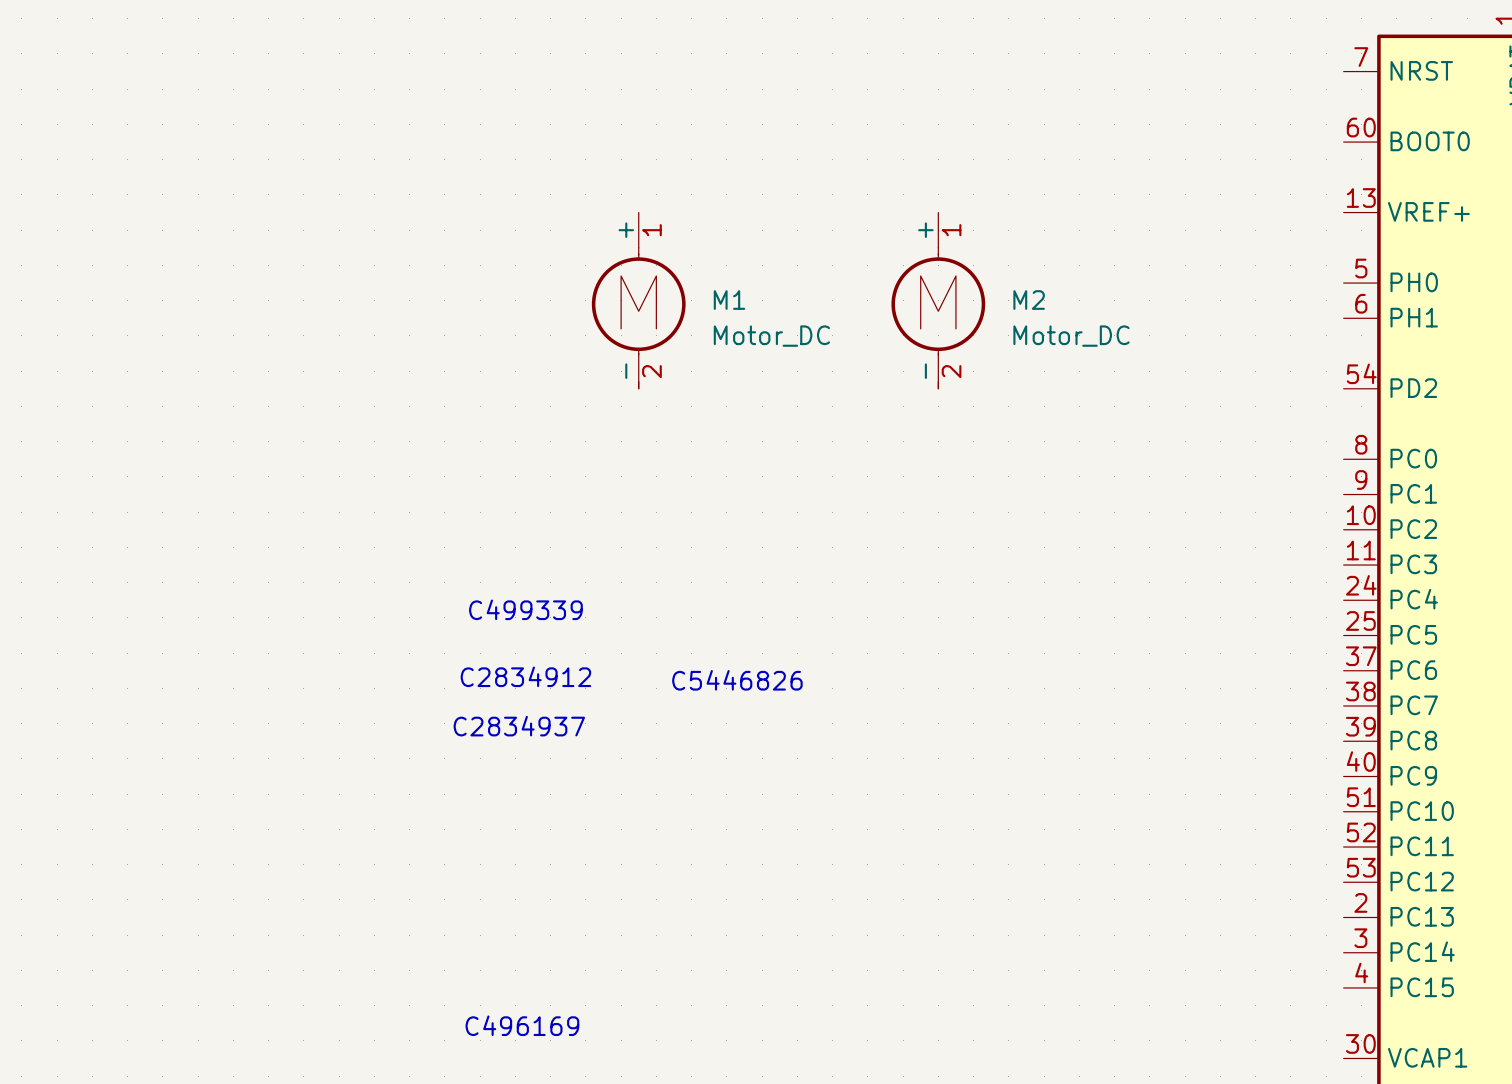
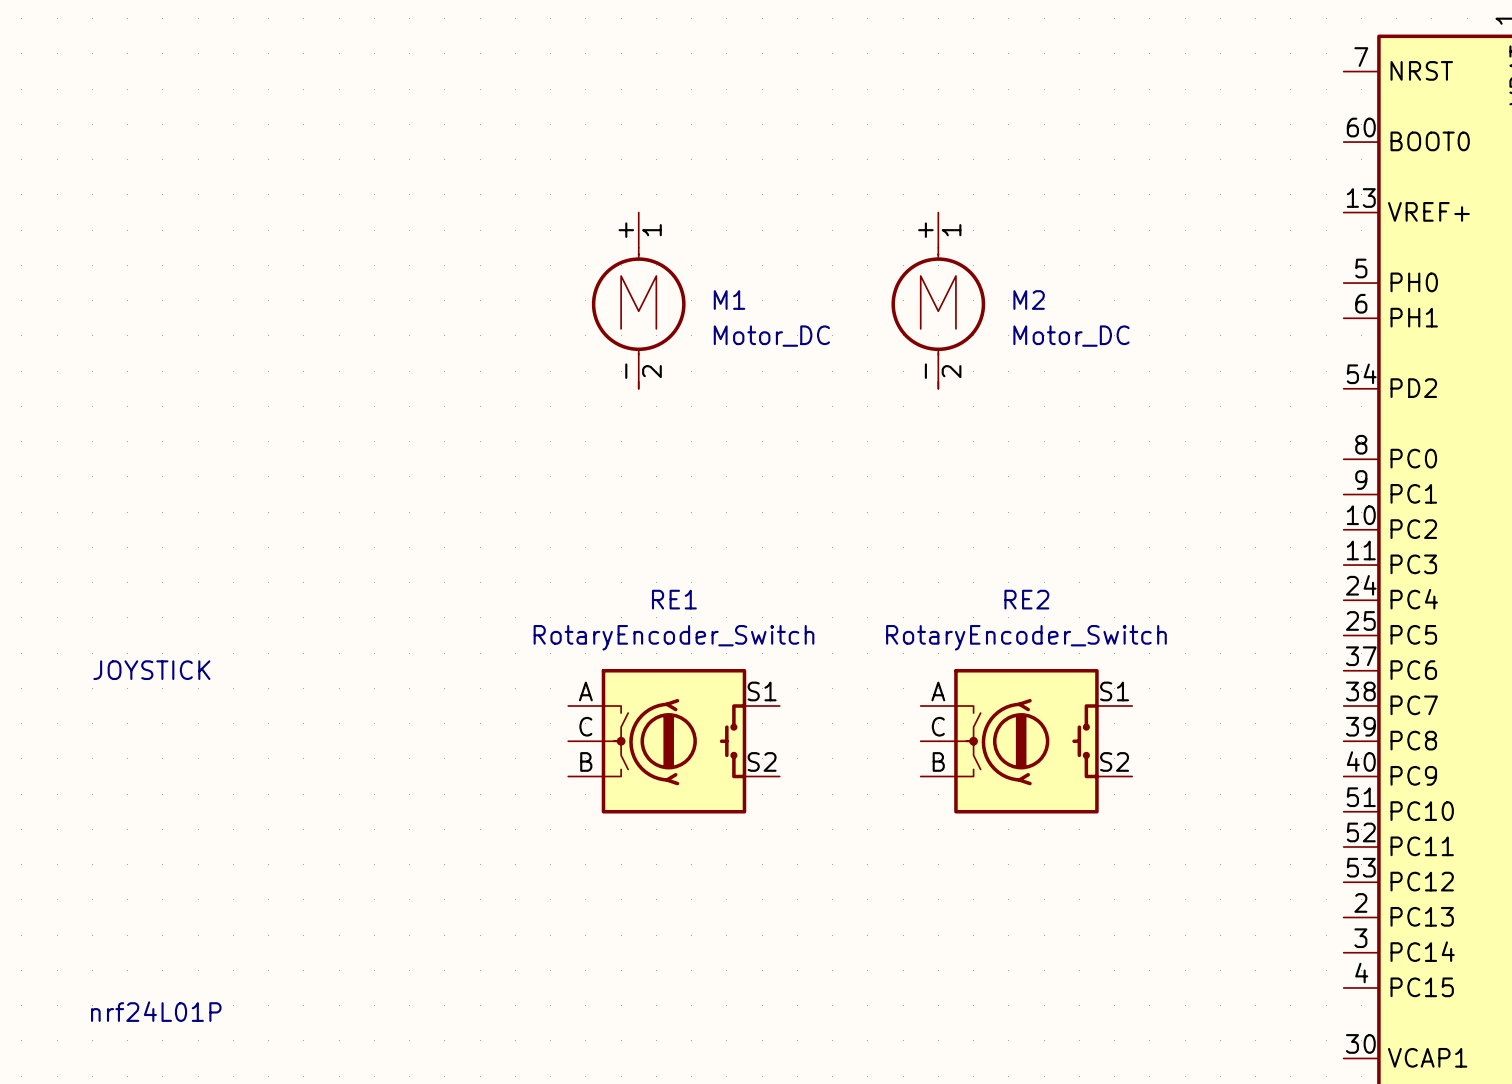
text: C499339 (525, 609) -> none
text: none -> JOYSTICK (151, 670)
text: C2834912 (525, 676) -> none
text: C5446826 (737, 680) -> none
text: C2834937 (519, 726) -> none
RE1: none -> RotaryEncoder_Switch (673, 741)
RE2: none -> RotaryEncoder_Switch (1026, 741)
text: none -> nrf24L01P (156, 1011)
text: C496169 (522, 1025) -> none

